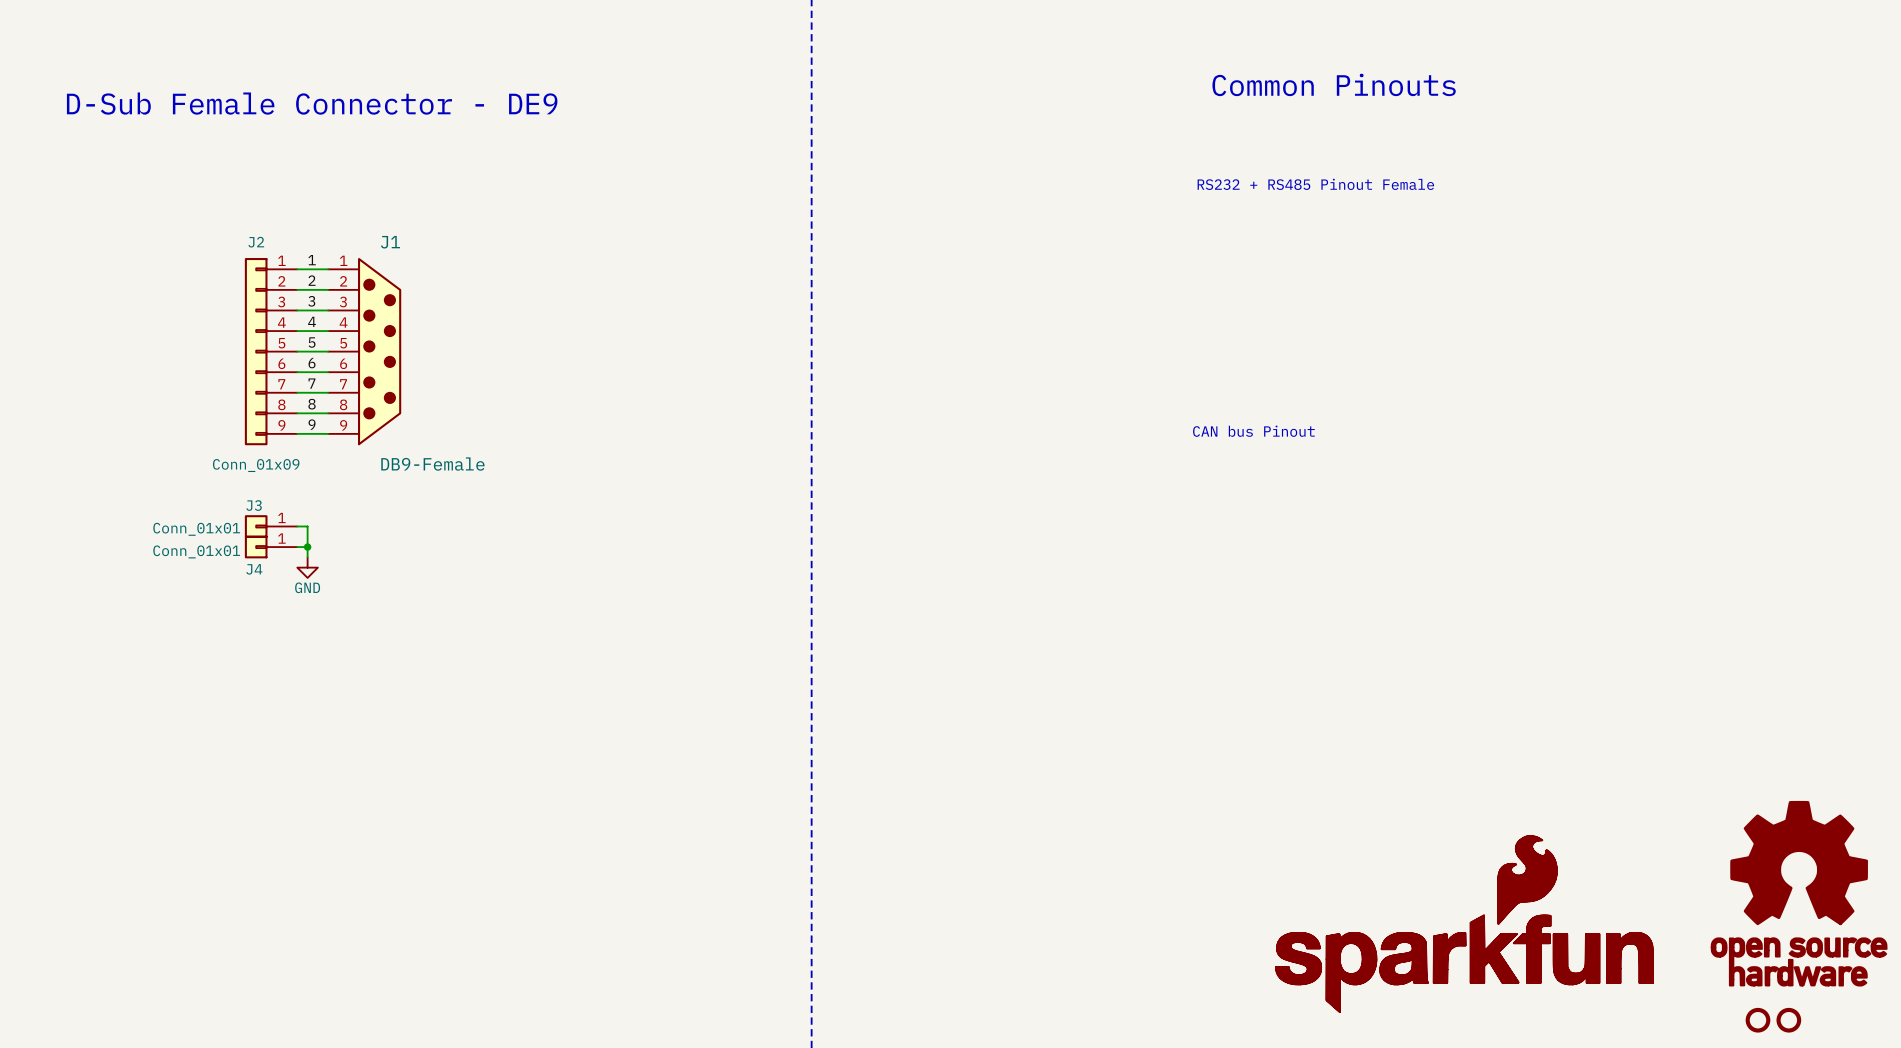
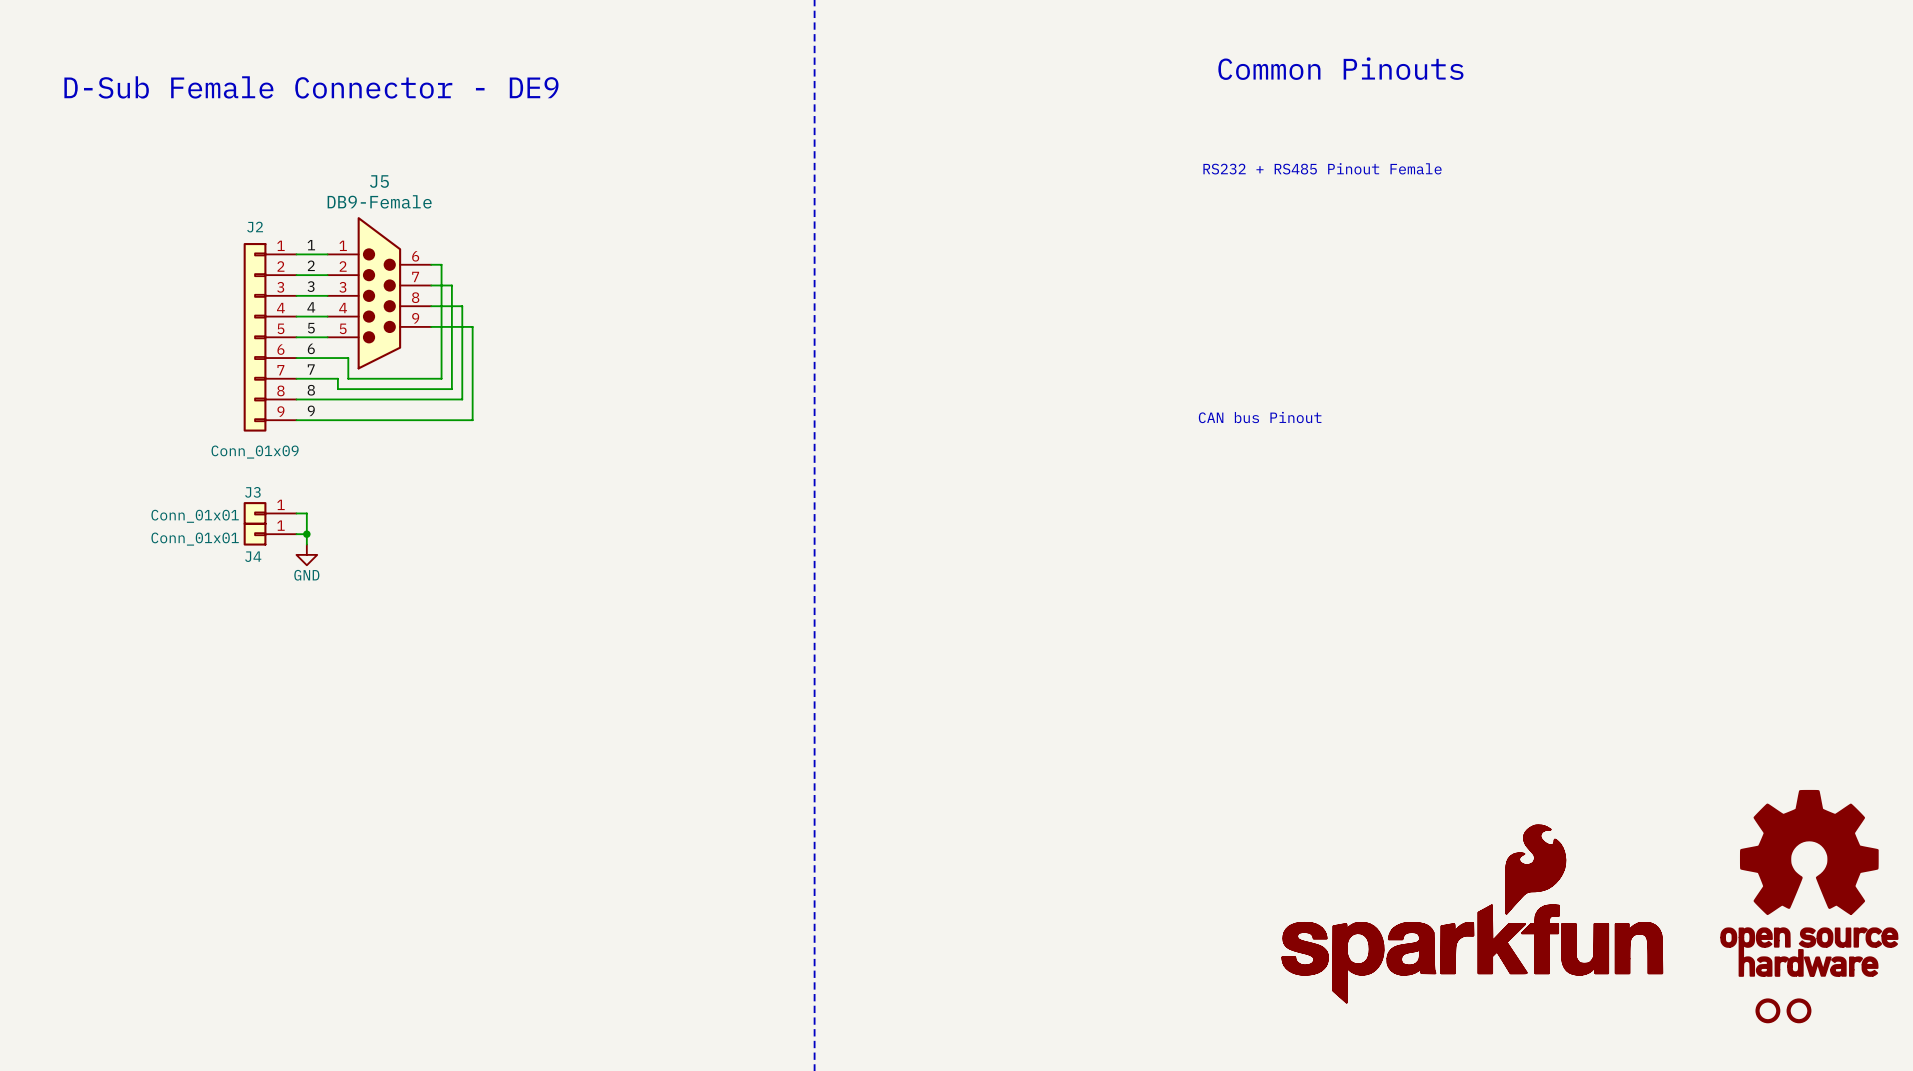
wire: none -> (431, 264) (441, 264) (441, 378) (348, 378) (348, 358) (327, 358)
wire: none -> (431, 285) (451, 285) (451, 389) (337, 389) (337, 378) (327, 378)
J5: none -> DB9-Female (379, 293)
wire: none -> (431, 306) (462, 306) (462, 399) (327, 399)
wire: none -> (431, 326) (472, 326) (472, 420) (327, 420)
J1: DB9-Female (364, 351) -> none

